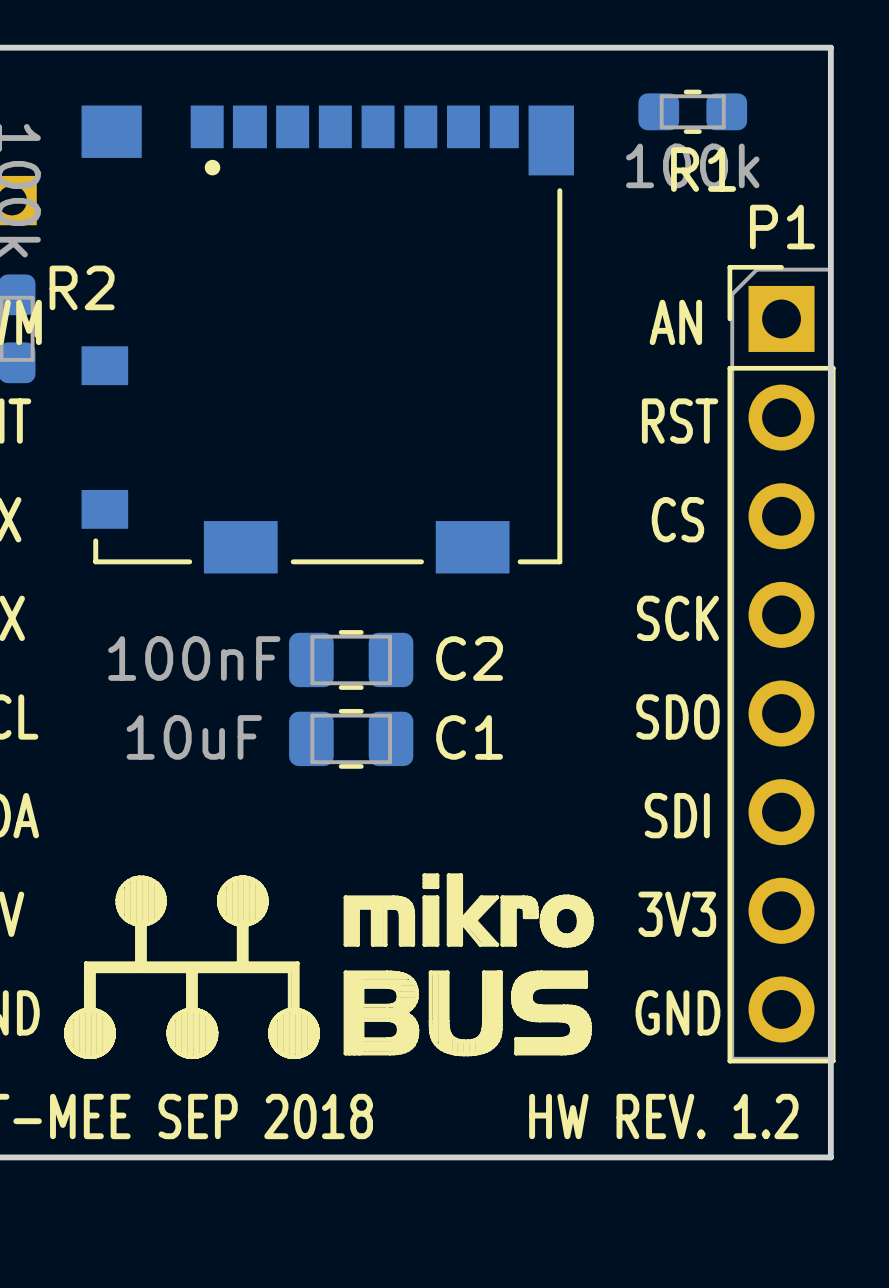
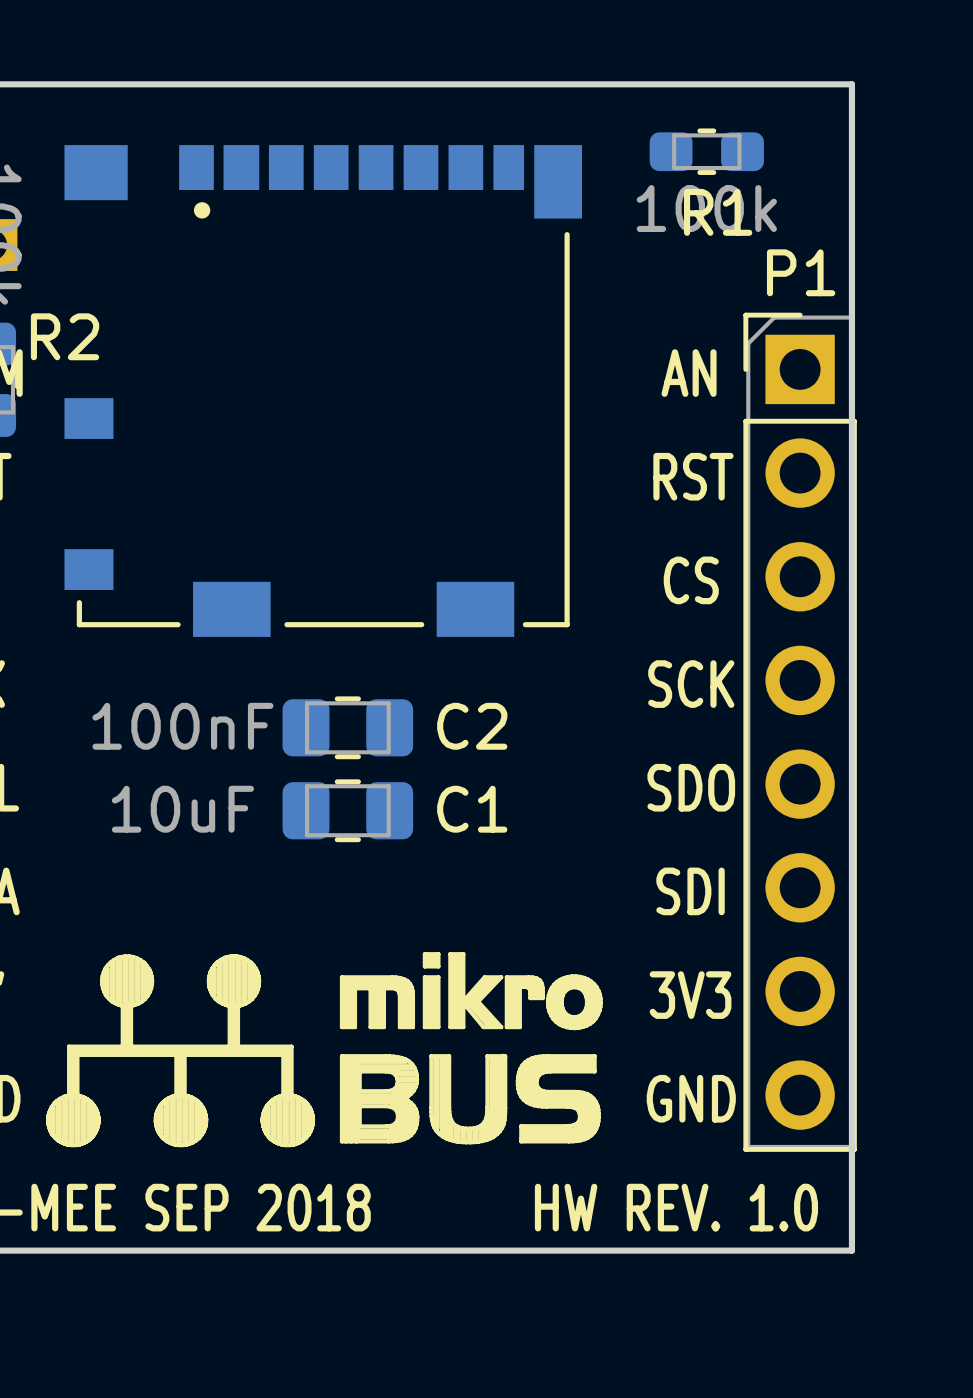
text: HW REV. 1.2 (663, 1116) -> HW REV. 1.0 (676, 1207)

